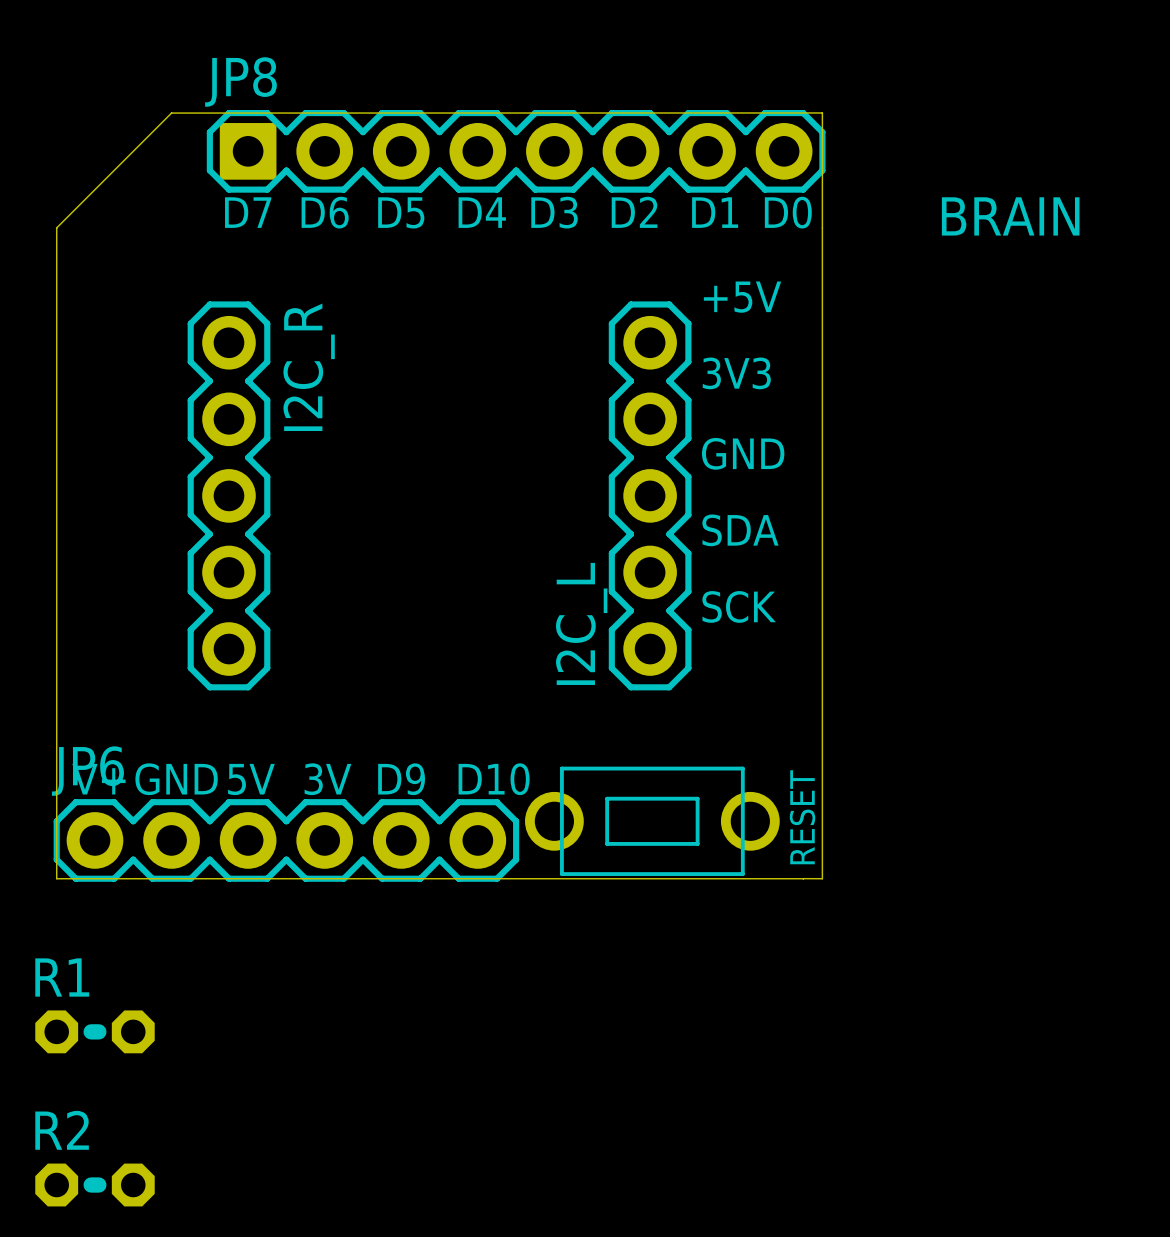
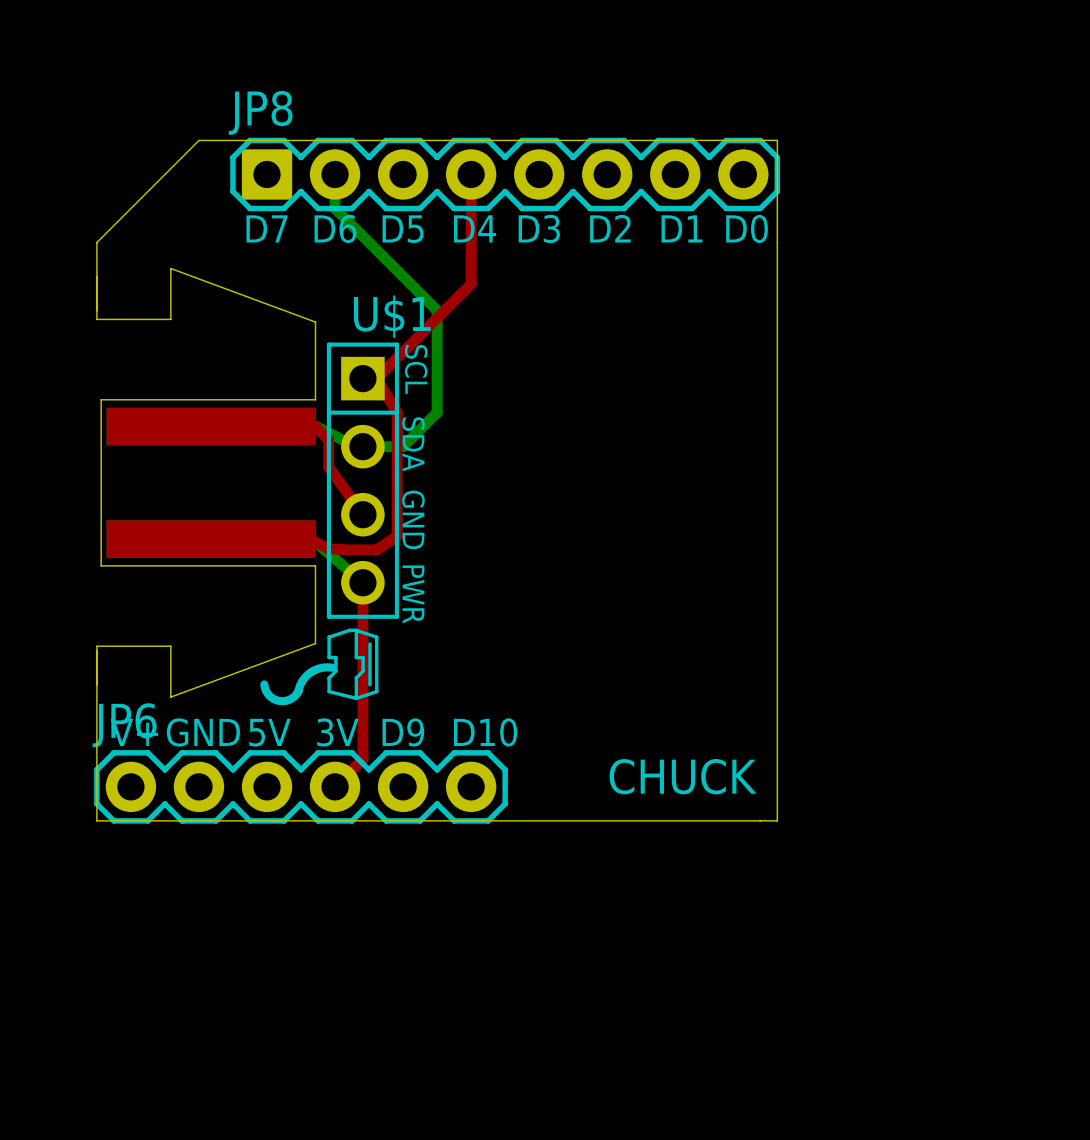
bottom track: none -> (335, 174) (335, 208) (437, 310) (437, 412) (403, 446) (362, 446)
top track: none -> (471, 174) (471, 283) (376, 378)
text: BRAIN (1010, 216) -> none
text: +5V (742, 297) -> none
board edge: (56, 304) (56, 687) -> none
text: 3V3 (736, 373) -> none
text: GND (743, 453) -> none
I2C_R: (228, 495) -> none
I2C_L: (650, 495) -> none
U$1: none -> (249, 486)
text: SDA (740, 530) -> none
text: SCK (739, 606) -> none
top track: none -> (362, 582) (362, 759) (335, 786)
text: RESET (802, 817) -> none
part: (652, 821) -> none
text: none -> CHUCK (683, 776)
R1: (94, 1031) -> none
R2: (94, 1185) -> none

